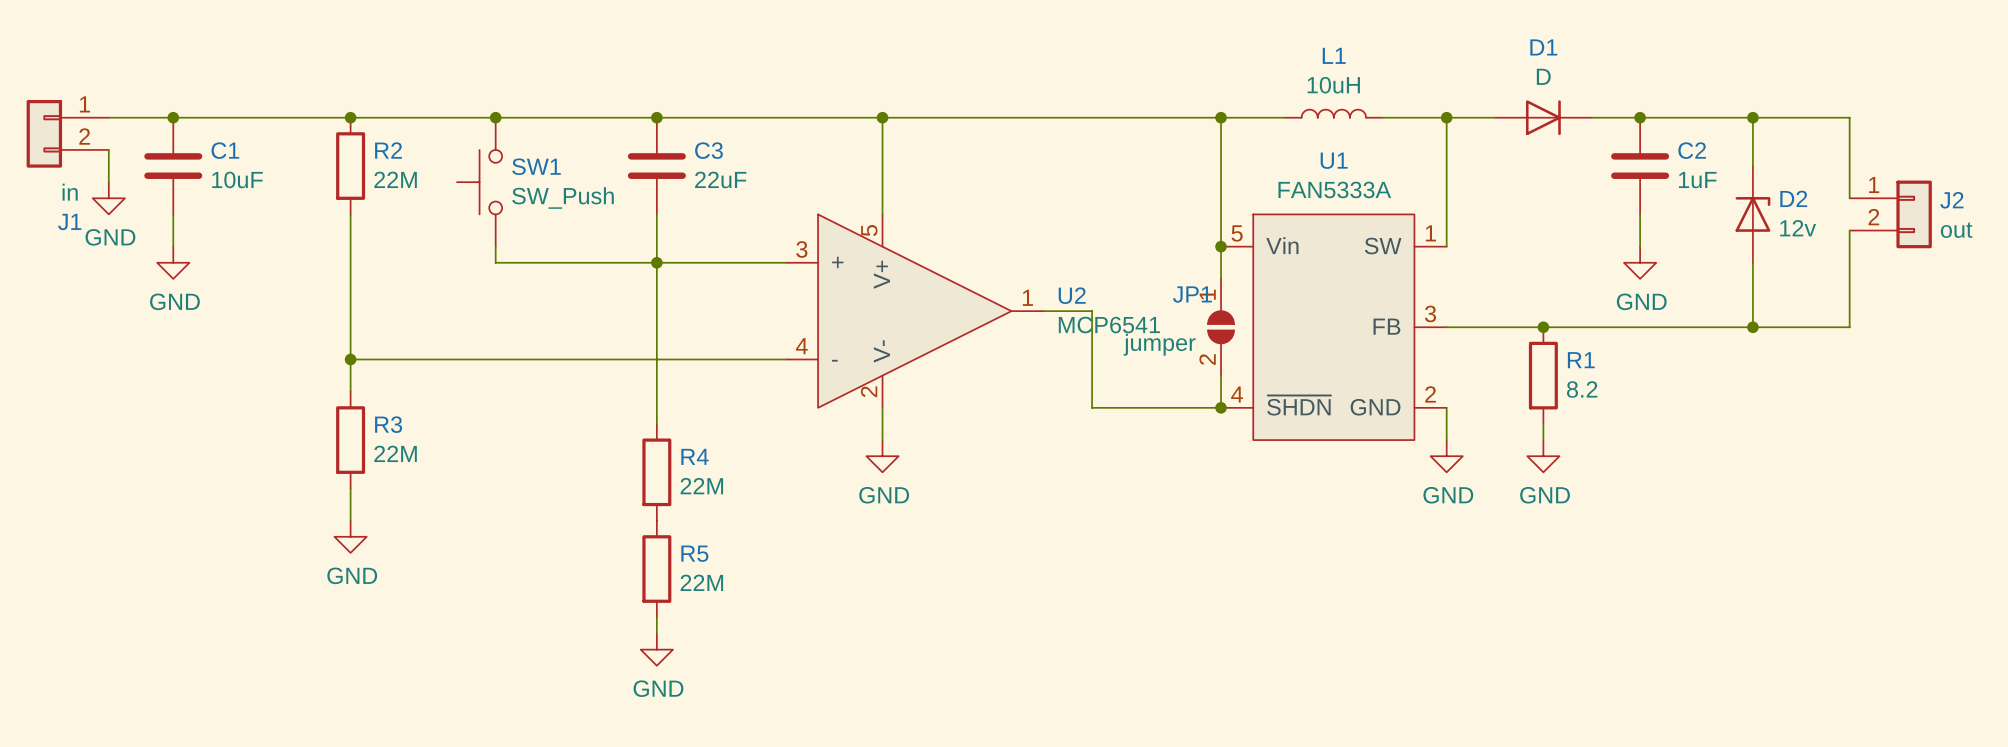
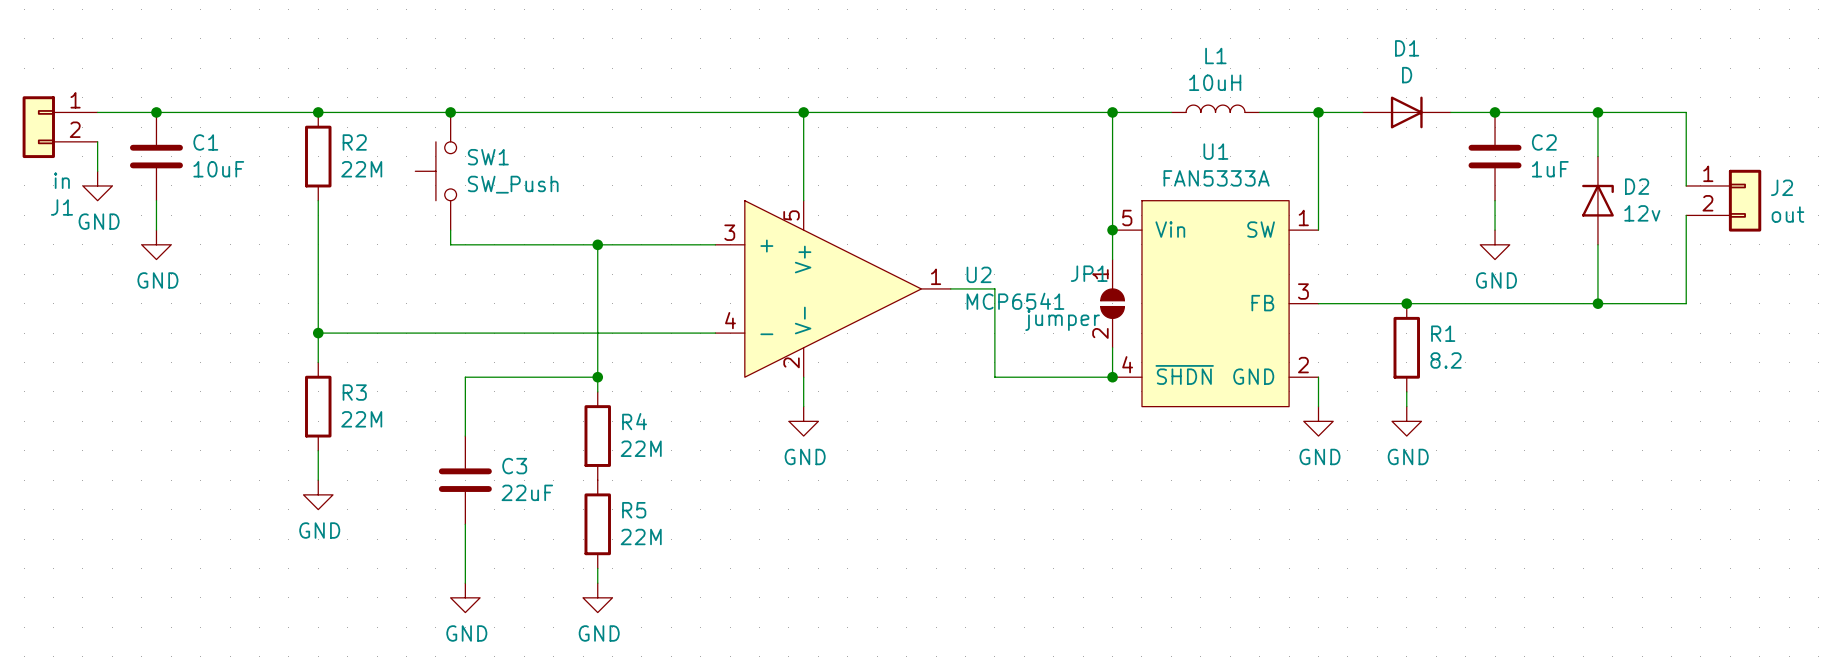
junction: (656, 117) -> none
C3 position: (656, 166) -> (465, 480)
wire: (656, 214) (656, 262) -> none
wire: none -> (597, 377) (465, 377) (465, 436)
junction: none -> (597, 377)
wire: none -> (465, 524) (465, 583)
power symbol: none -> GND (465, 597)

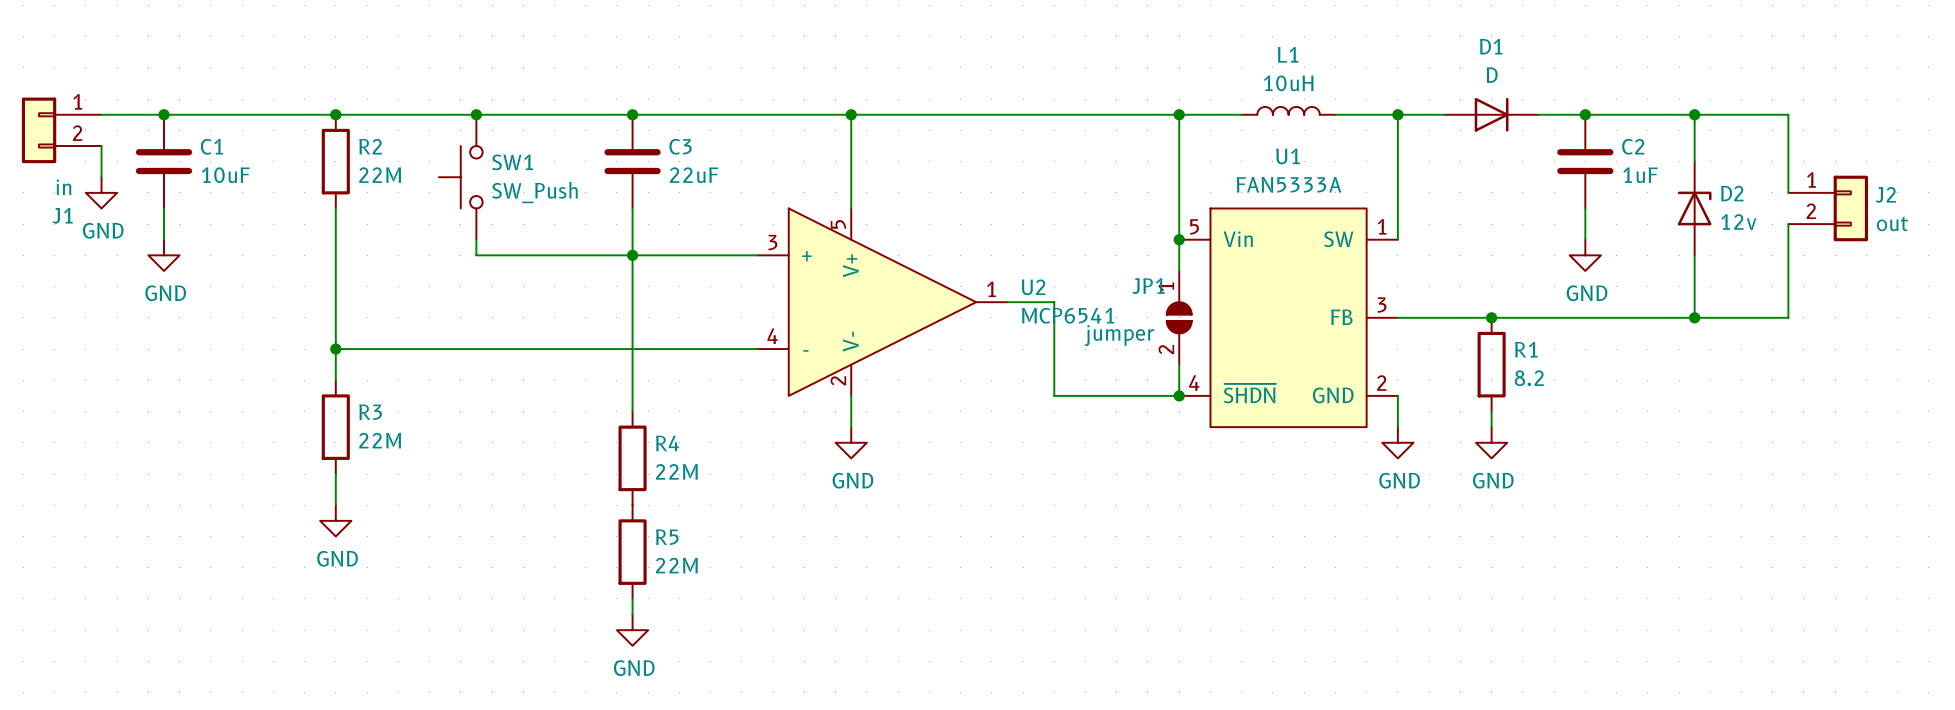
junction: none -> (632, 114)
wire: none -> (632, 208) (632, 255)
wire: (597, 377) (465, 377) (465, 436) -> none
junction: (597, 377) -> none
C3 position: (465, 480) -> (632, 161)
wire: (465, 524) (465, 583) -> none
power symbol: GND (465, 597) -> none

